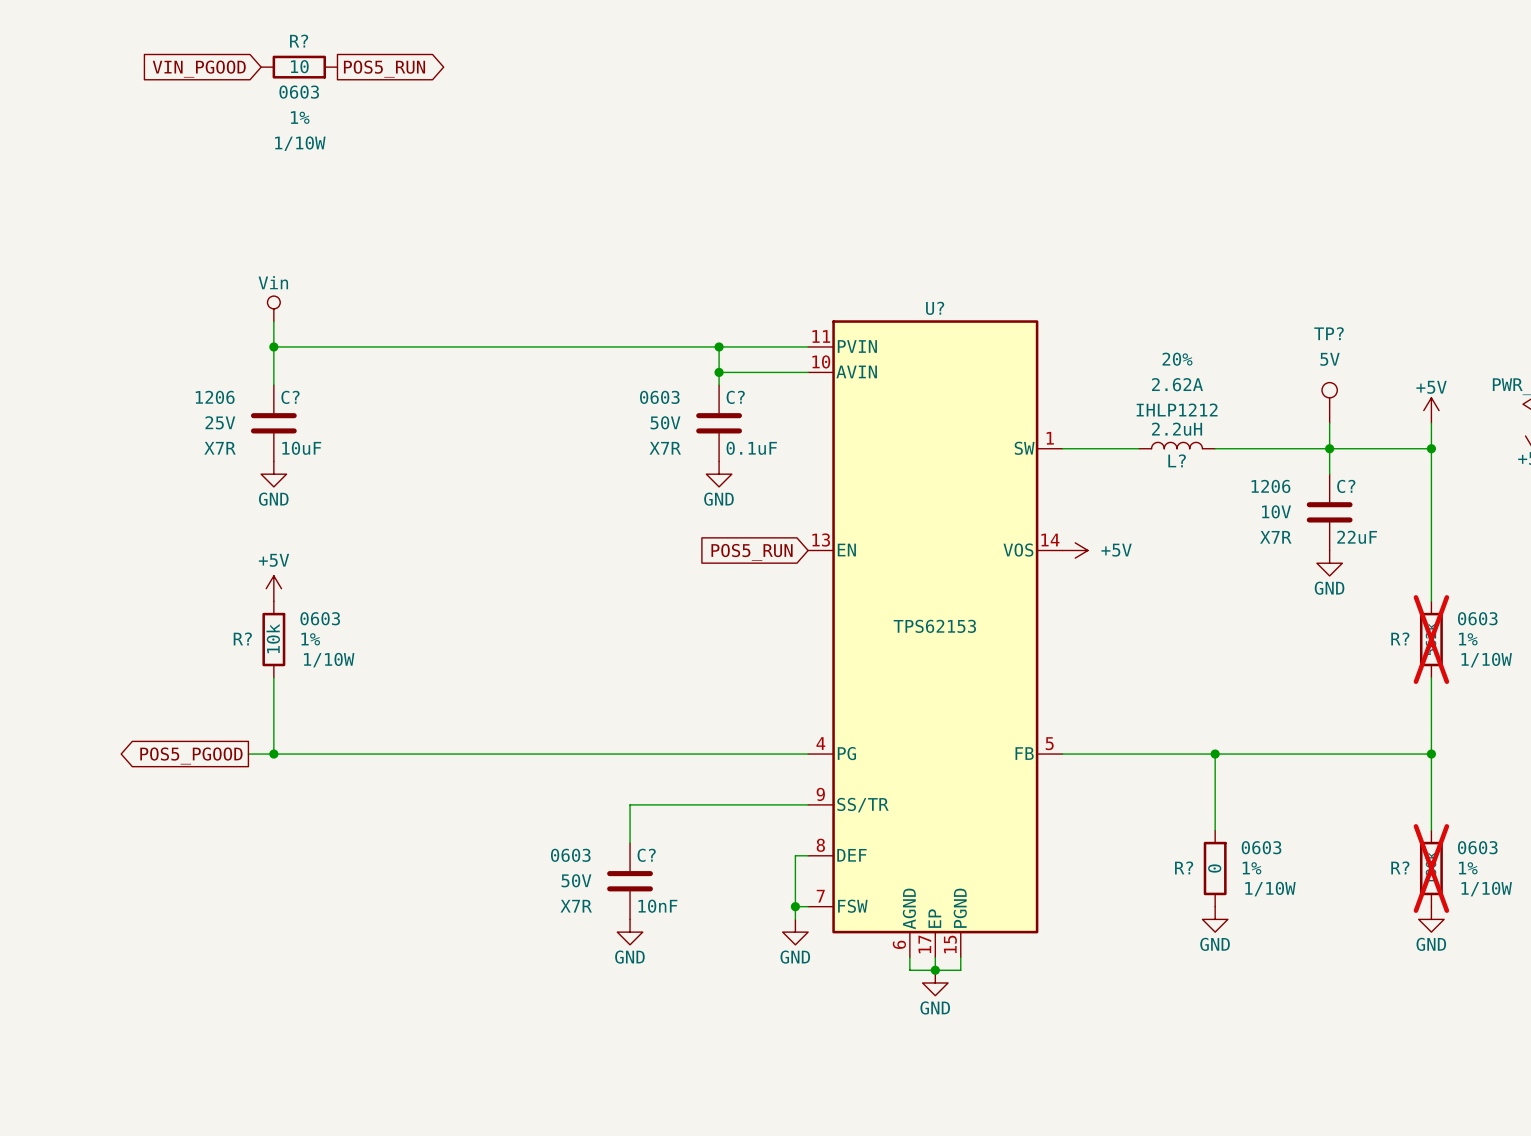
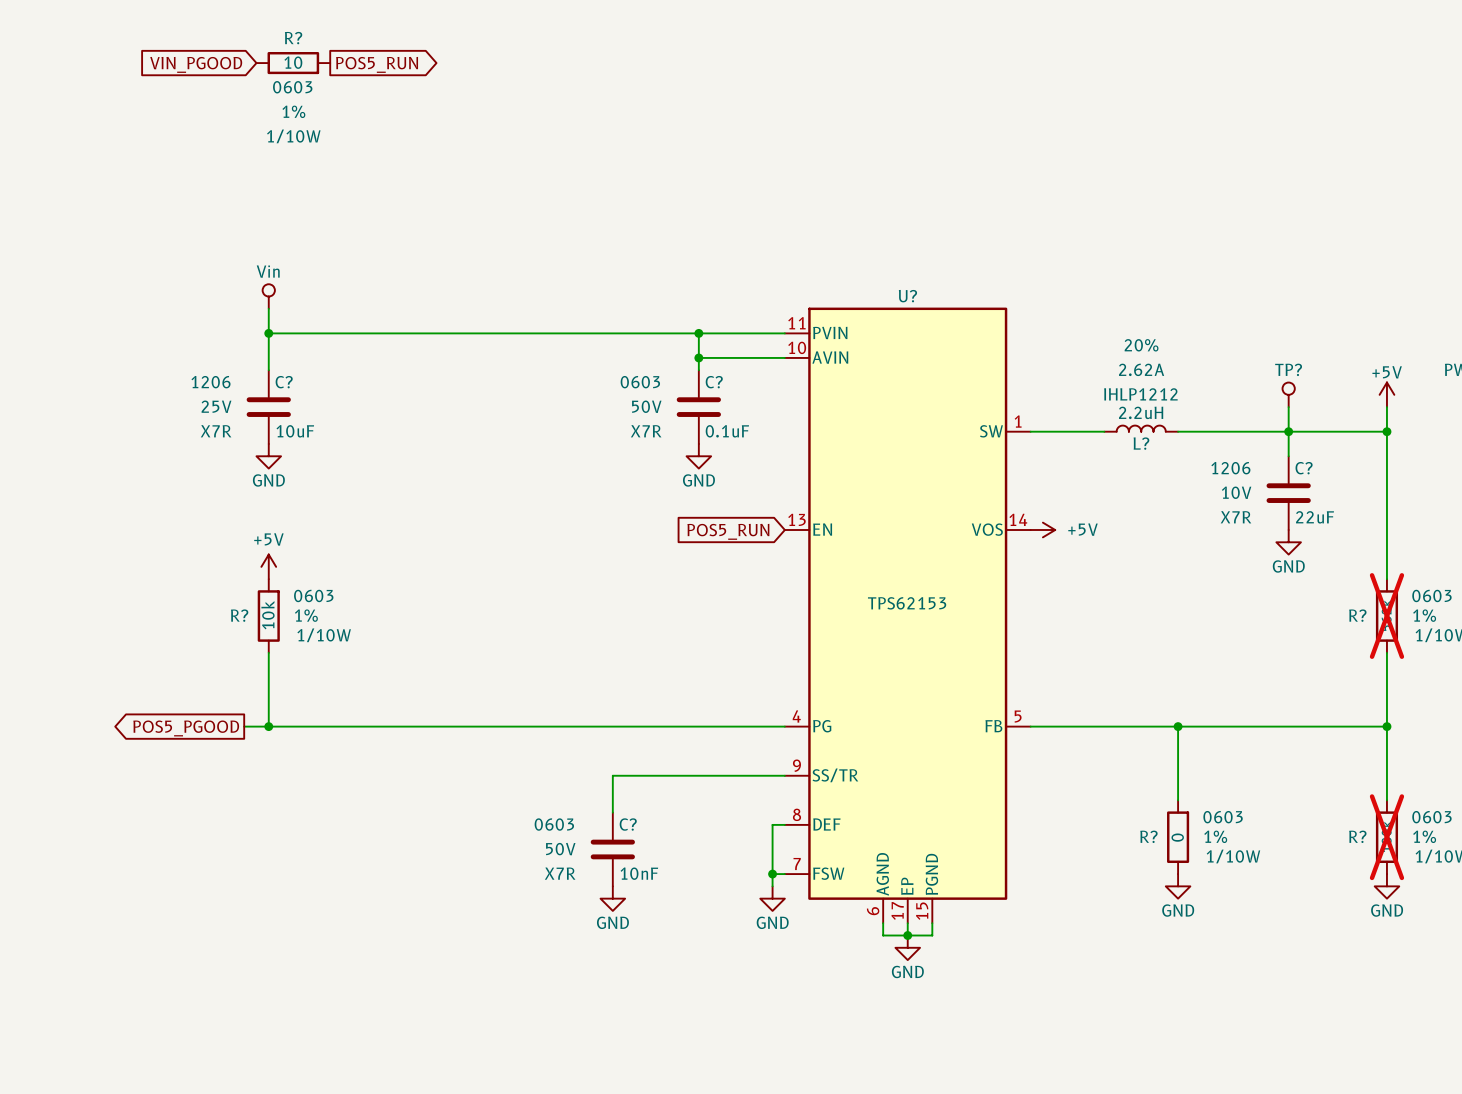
TP? name position: TP? (1329, 333) -> TP? (1288, 369)
TP? value: 5V (1330, 359) -> none
TP? symbol: [1322, 382, 1338, 424] -> [1282, 382, 1295, 408]

